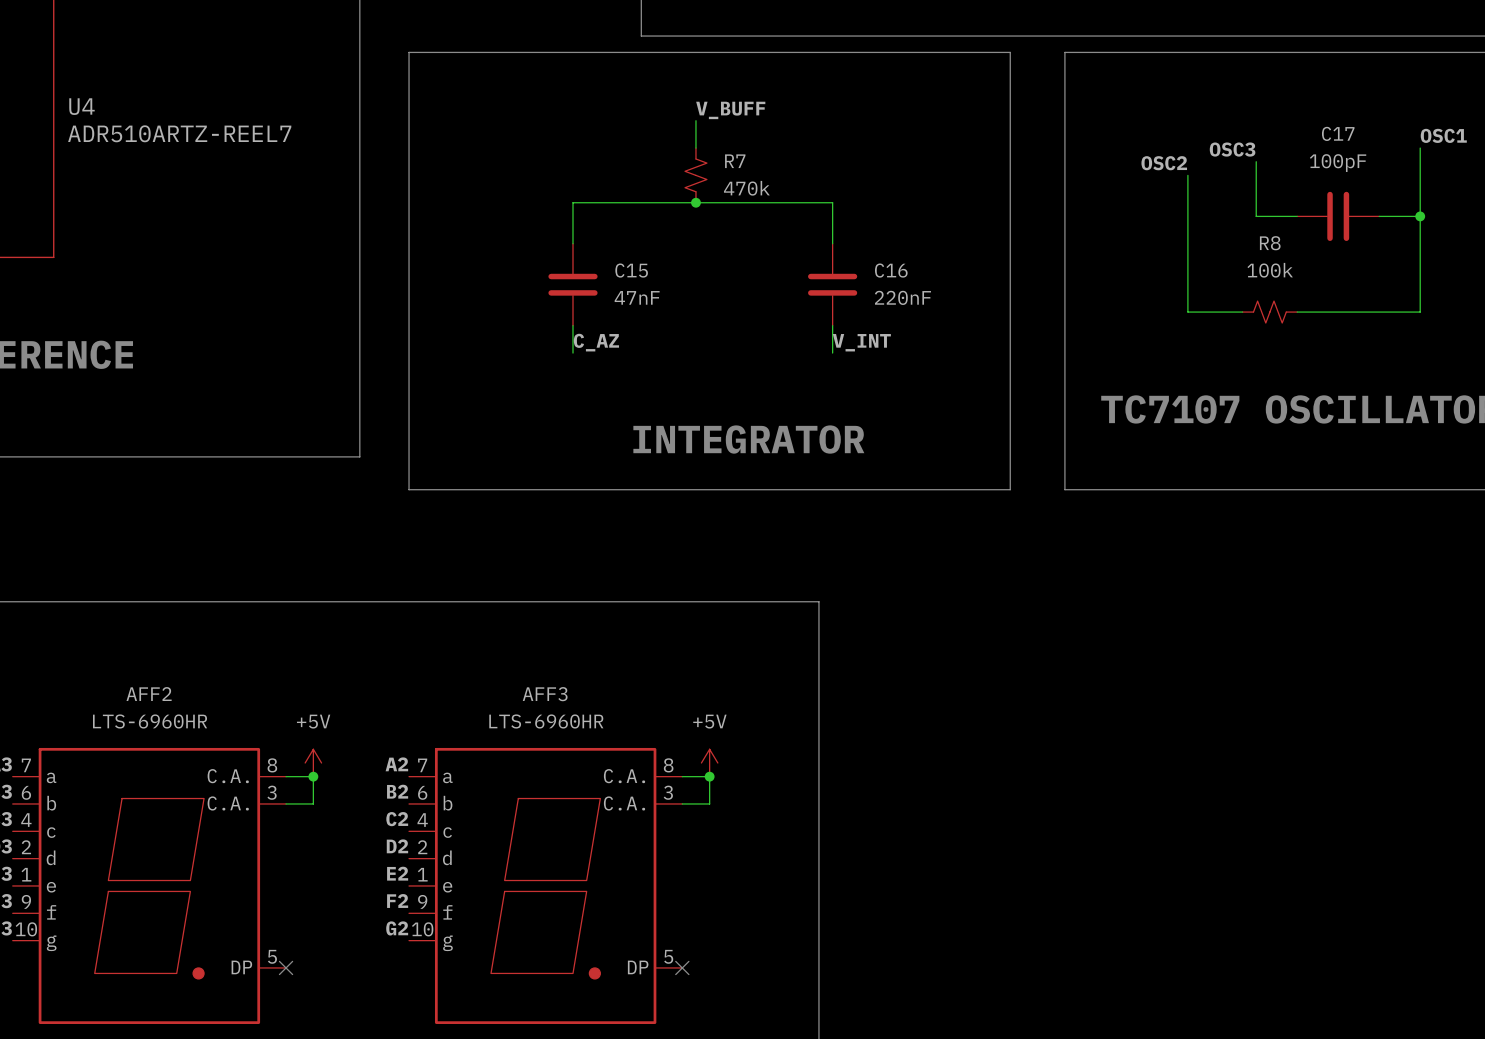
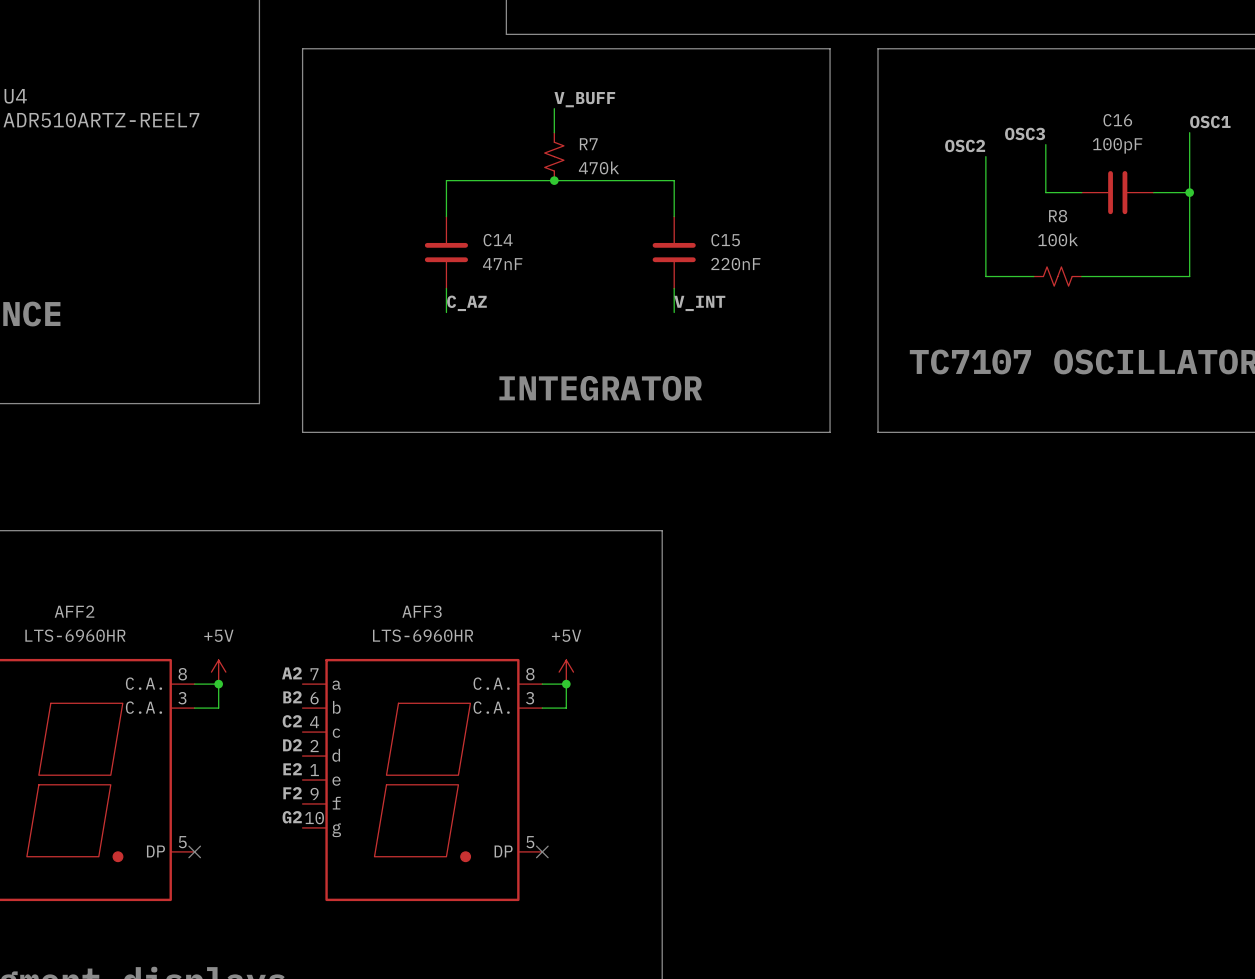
C17 name: C17 (1338, 133) -> C16 (1117, 120)
C15 name: C15 (631, 270) -> C14 (498, 240)
C16 name: C16 (891, 270) -> C15 (725, 240)

